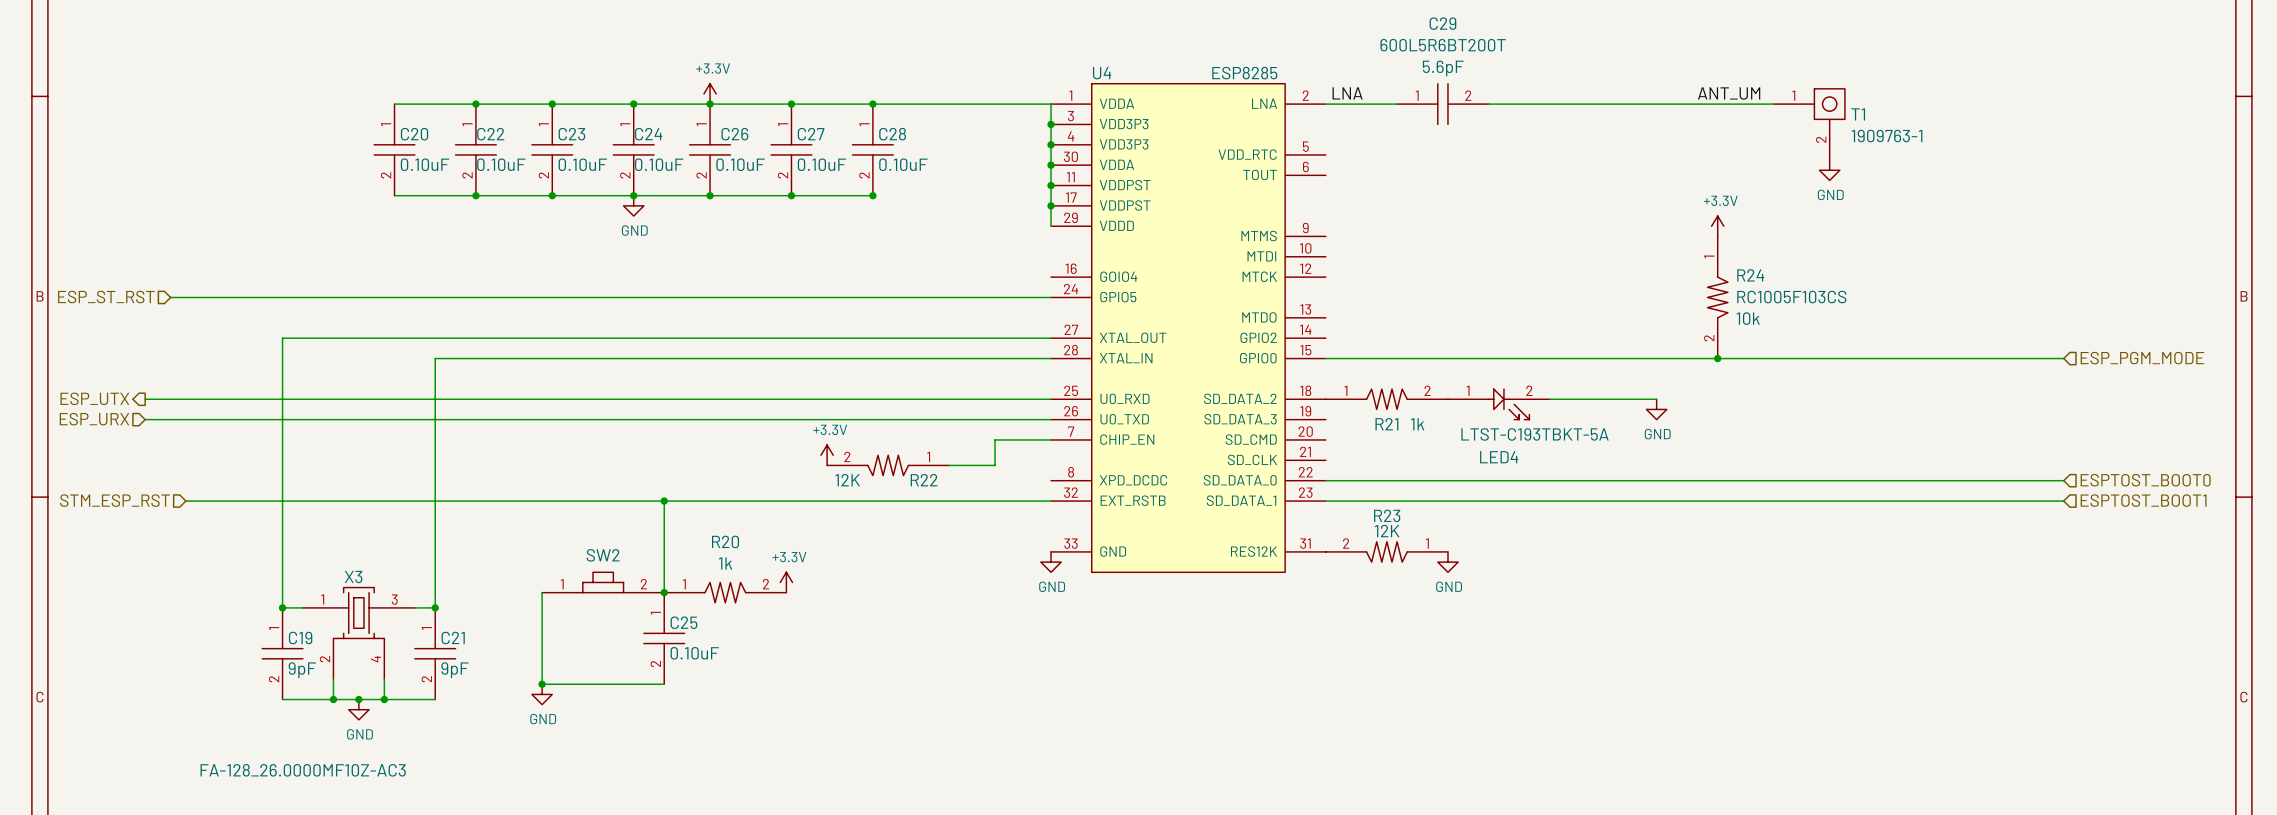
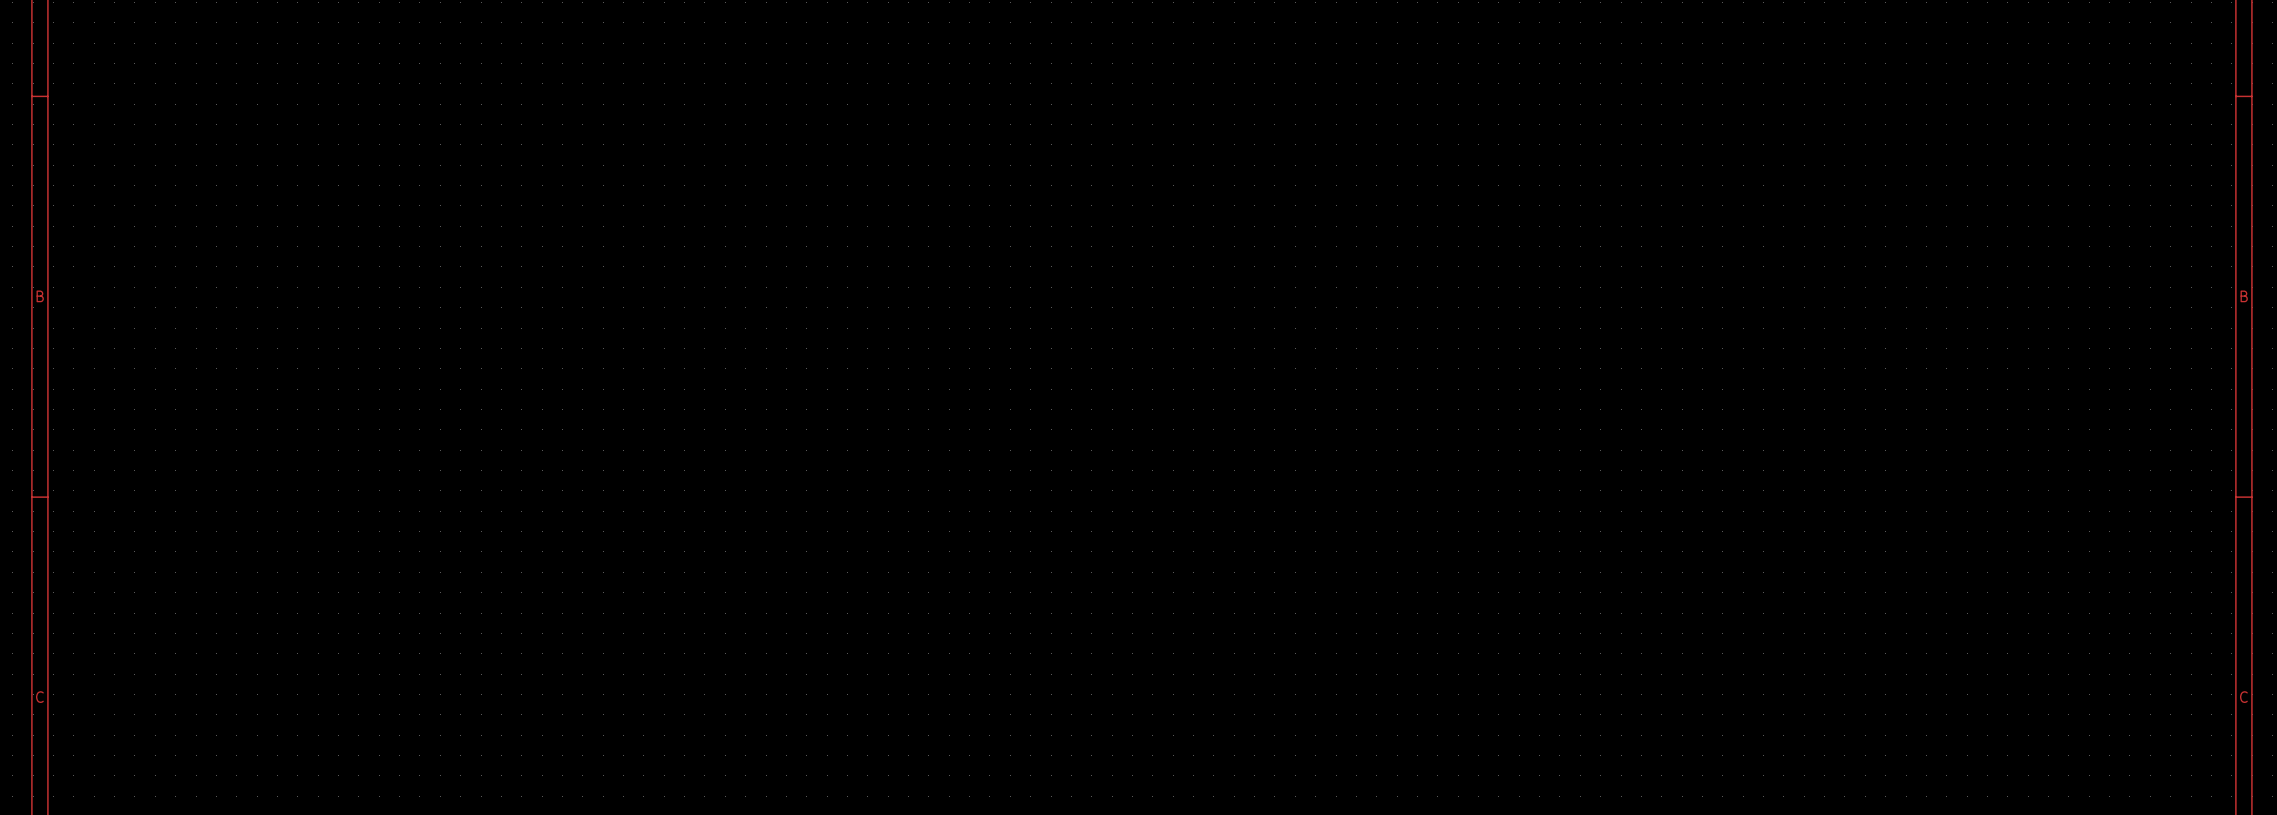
power symbol: +3.3V (710, 93) -> none
label: LNA (1347, 93) -> none
label: ANT_UM (1729, 93) -> none
wire: (394, 104) (1051, 104) (1051, 226) -> none
junction: (475, 104) -> none
junction: (552, 104) -> none
junction: (633, 104) -> none
junction: (710, 104) -> none
junction: (791, 104) -> none
junction: (872, 104) -> none
wire: (1325, 104) (1397, 104) -> none
C29: 600L5R6BT200T (1442, 104) -> none
wire: (1488, 104) (1773, 104) -> none
junction: (1051, 124) -> none
T1: 1909763-1 (1809, 124) -> none
junction: (1051, 144) -> none
C20: (394, 149) -> none
C22: (475, 149) -> none
C23: (552, 149) -> none
C24: (633, 149) -> none
C26: (710, 149) -> none
C27: (791, 149) -> none
C28: (872, 149) -> none
junction: (1051, 165) -> none
power symbol: GND (1829, 170) -> none
junction: (1051, 185) -> none
wire: (394, 195) (872, 195) -> none
junction: (475, 195) -> none
junction: (552, 195) -> none
junction: (633, 195) -> none
junction: (710, 195) -> none
junction: (791, 195) -> none
junction: (872, 195) -> none
power symbol: GND (633, 205) -> none
junction: (1051, 205) -> none
power symbol: +3.3V (1717, 226) -> none
hierarchical label: ESP_ST_RST (106, 297) -> none
wire: (170, 297) (1051, 297) -> none
R24: RC1005F103CS (1717, 297) -> none
U4: ESP8285 (1188, 328) -> none
wire: (1051, 338) (282, 338) (282, 607) (302, 607) -> none
wire: (1051, 358) (435, 358) (435, 607) (414, 607) -> none
wire: (1325, 358) (2063, 358) -> none
junction: (1717, 358) -> none
hierarchical label: ESP_PGM_MODE (2142, 358) -> none
hierarchical label: ESP_UTX (94, 398) -> none
wire: (145, 399) (1051, 399) -> none
R21: (1386, 399) -> none
wire: (1549, 399) (1656, 399) -> none
LED4: LTST-C193TBKT-5A (1498, 404) -> none
power symbol: GND (1656, 409) -> none
hierarchical label: ESP_URX (94, 419) -> none
wire: (145, 419) (1051, 419) -> none
wire: (1051, 439) (995, 439) (995, 465) (949, 465) -> none
power symbol: +3.3V (827, 455) -> none
R22: (888, 465) -> none
wire: (1325, 480) (2063, 480) -> none
hierarchical label: ESPTOST_BOOT0 (2145, 480) -> none
hierarchical label: STM_ESP_RST (114, 500) -> none
hierarchical label: ESPTOST_BOOT1 (2143, 500) -> none
wire: (185, 501) (1051, 501) -> none
wire: (664, 501) (664, 592) -> none
junction: (664, 501) -> none
wire: (1325, 501) (2063, 501) -> none
R23: (1386, 551) -> none
power symbol: GND (1051, 562) -> none
power symbol: GND (1447, 562) -> none
SW2: (603, 582) -> none
power symbol: +3.3V (786, 582) -> none
wire: (542, 592) (542, 684) (664, 684) -> none
junction: (664, 592) -> none
R20: (725, 592) -> none
junction: (282, 607) -> none
junction: (435, 607) -> none
X3: FA-128_26.0000MF10Z-AC3 (358, 633) -> none
C25: (664, 638) -> none
C19: (282, 653) -> none
C21: (435, 653) -> none
wire: (333, 679) (333, 699) -> none
wire: (384, 679) (384, 699) -> none
junction: (542, 684) -> none
power symbol: GND (542, 694) -> none
wire: (282, 699) (435, 699) -> none
junction: (333, 699) -> none
junction: (358, 699) -> none
junction: (384, 699) -> none
power symbol: GND (358, 709) -> none

